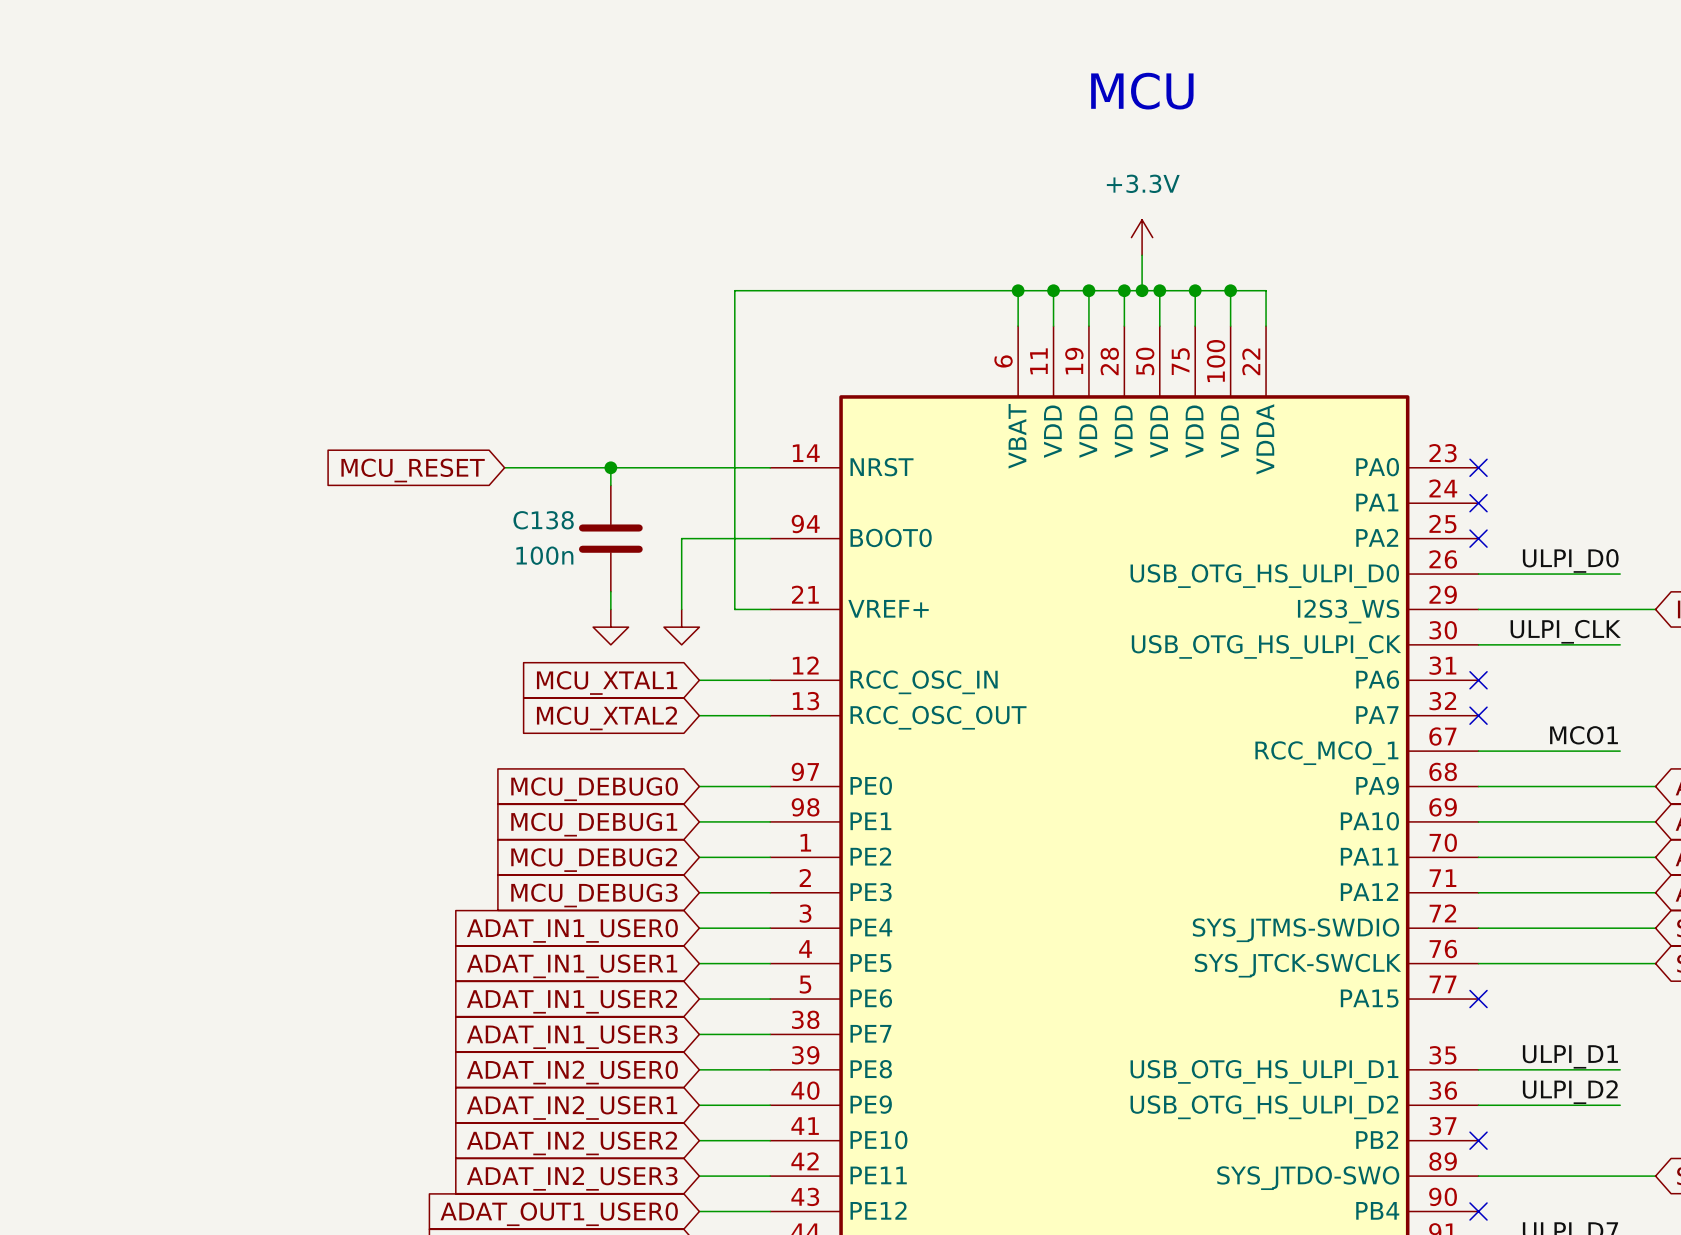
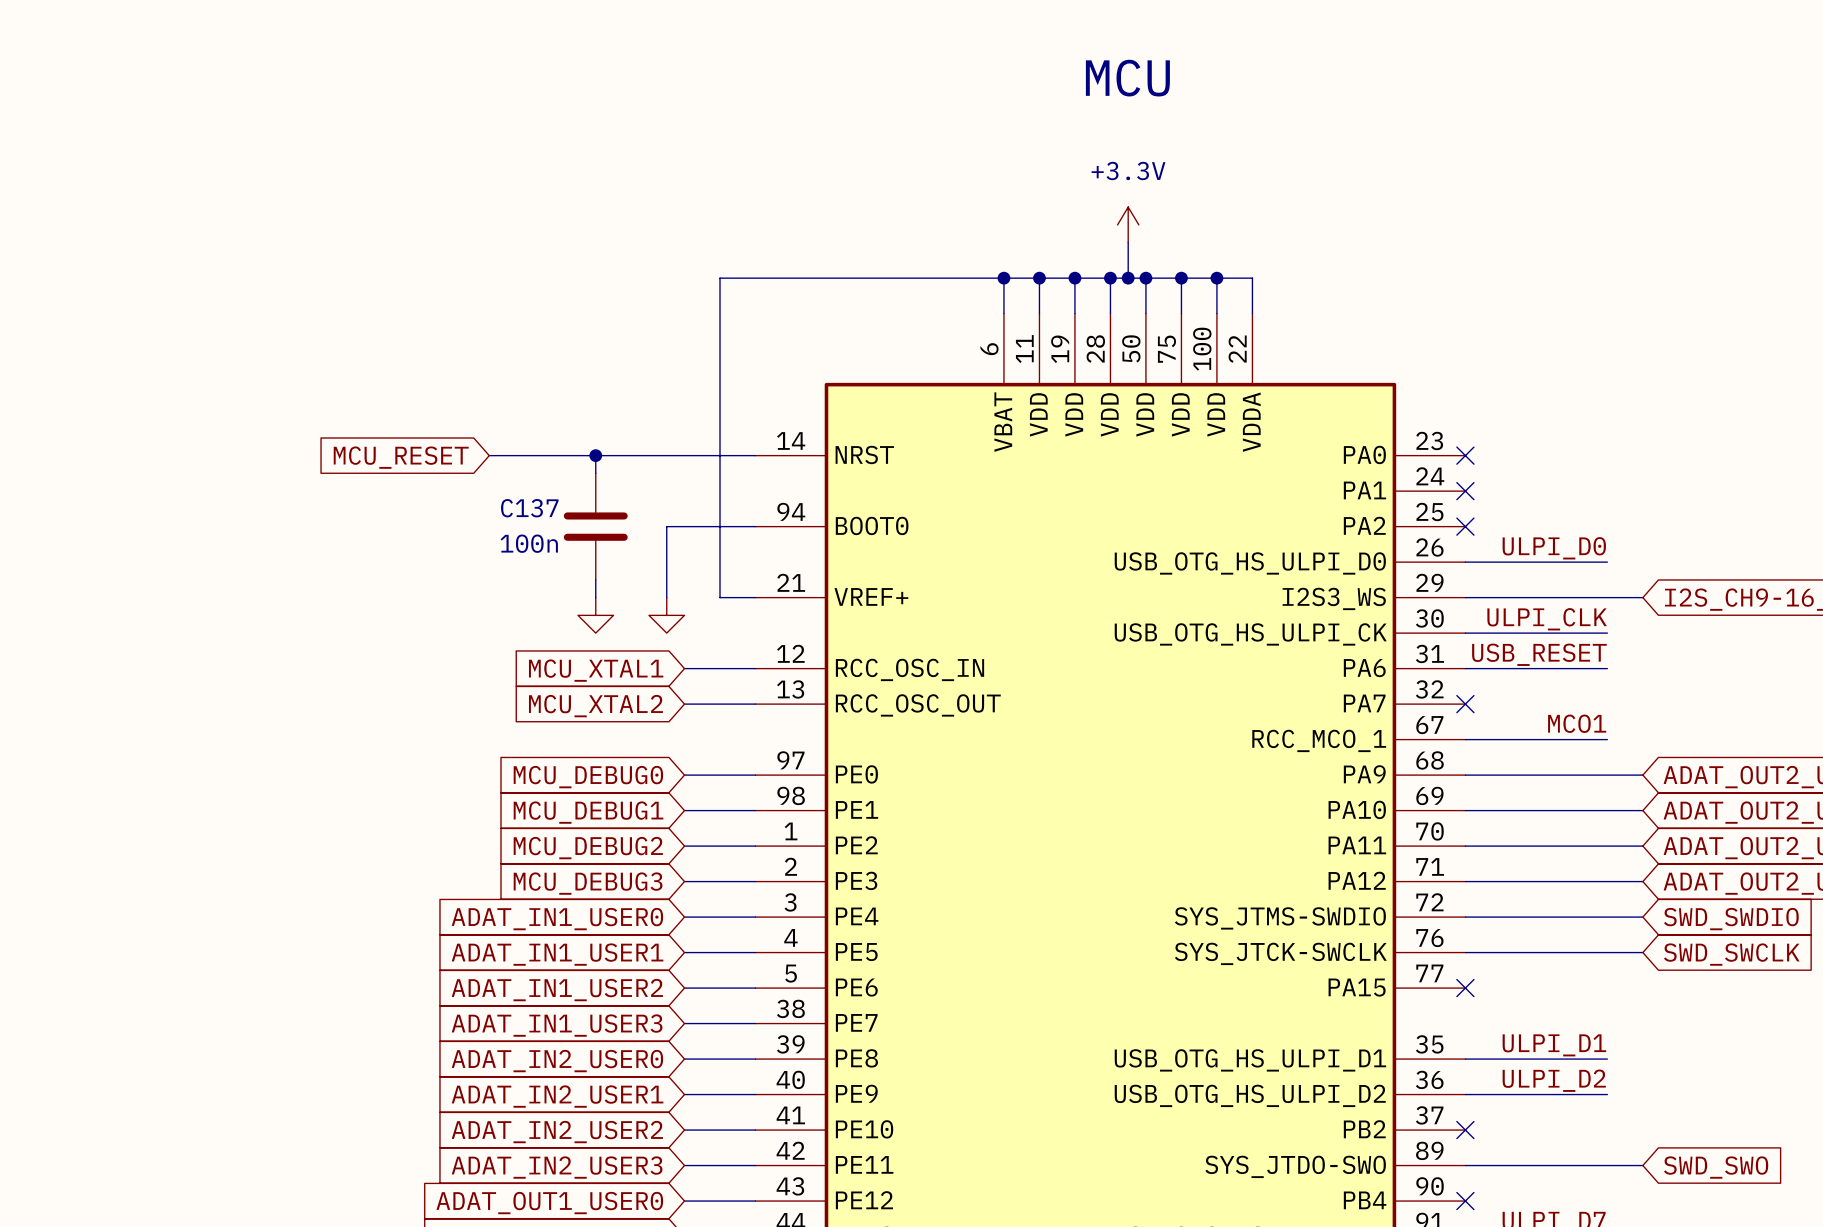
C138 name: C138 (543, 520) -> C137 (529, 508)
label: none -> USB_RESET (1539, 654)
wire: none -> (1465, 668) (1607, 668)
no-connect mark: (1478, 680) -> none

